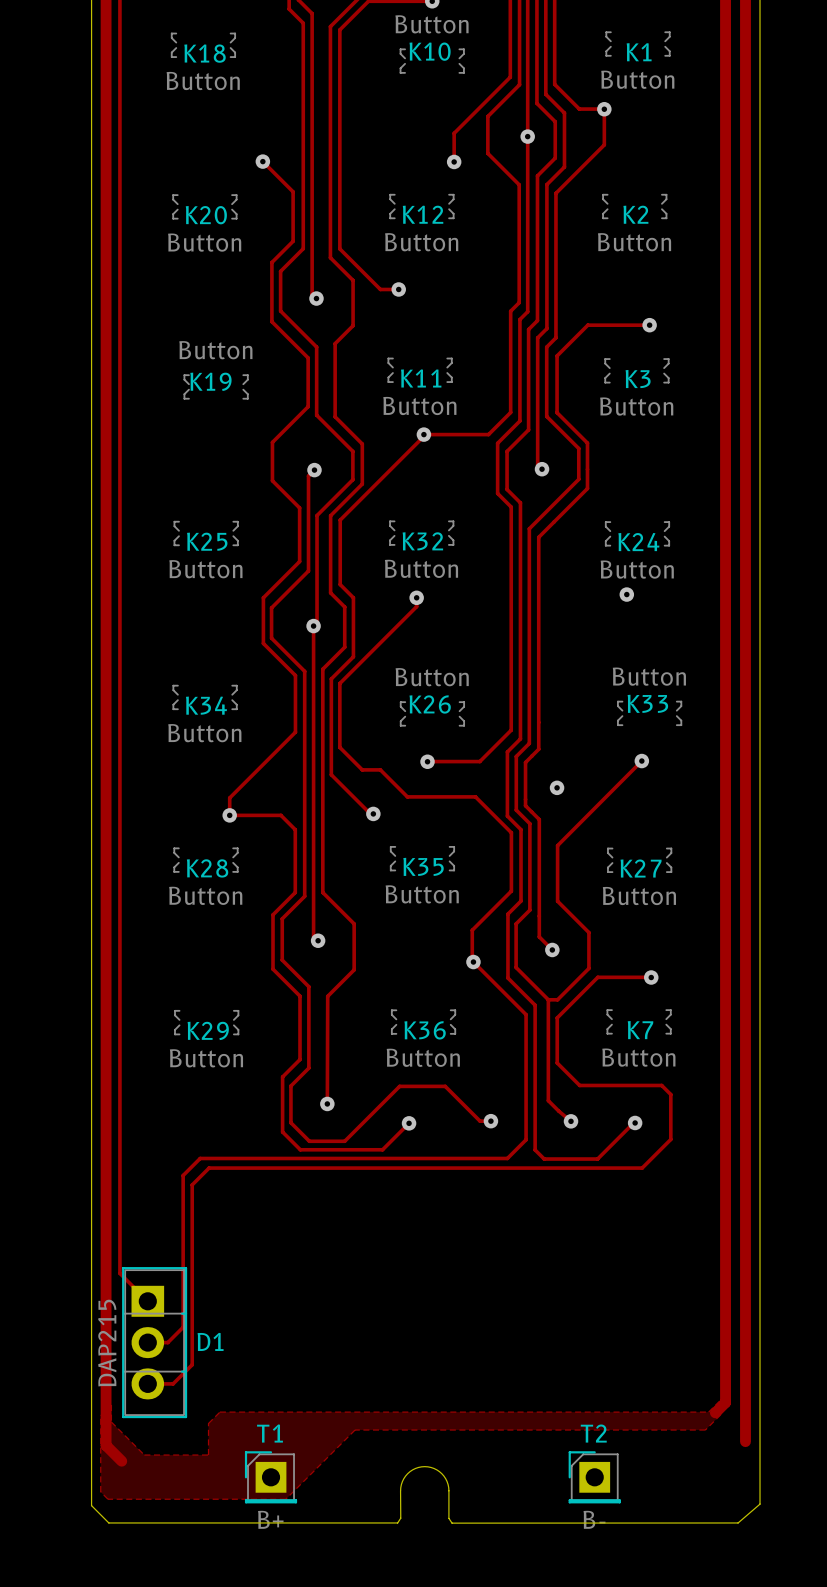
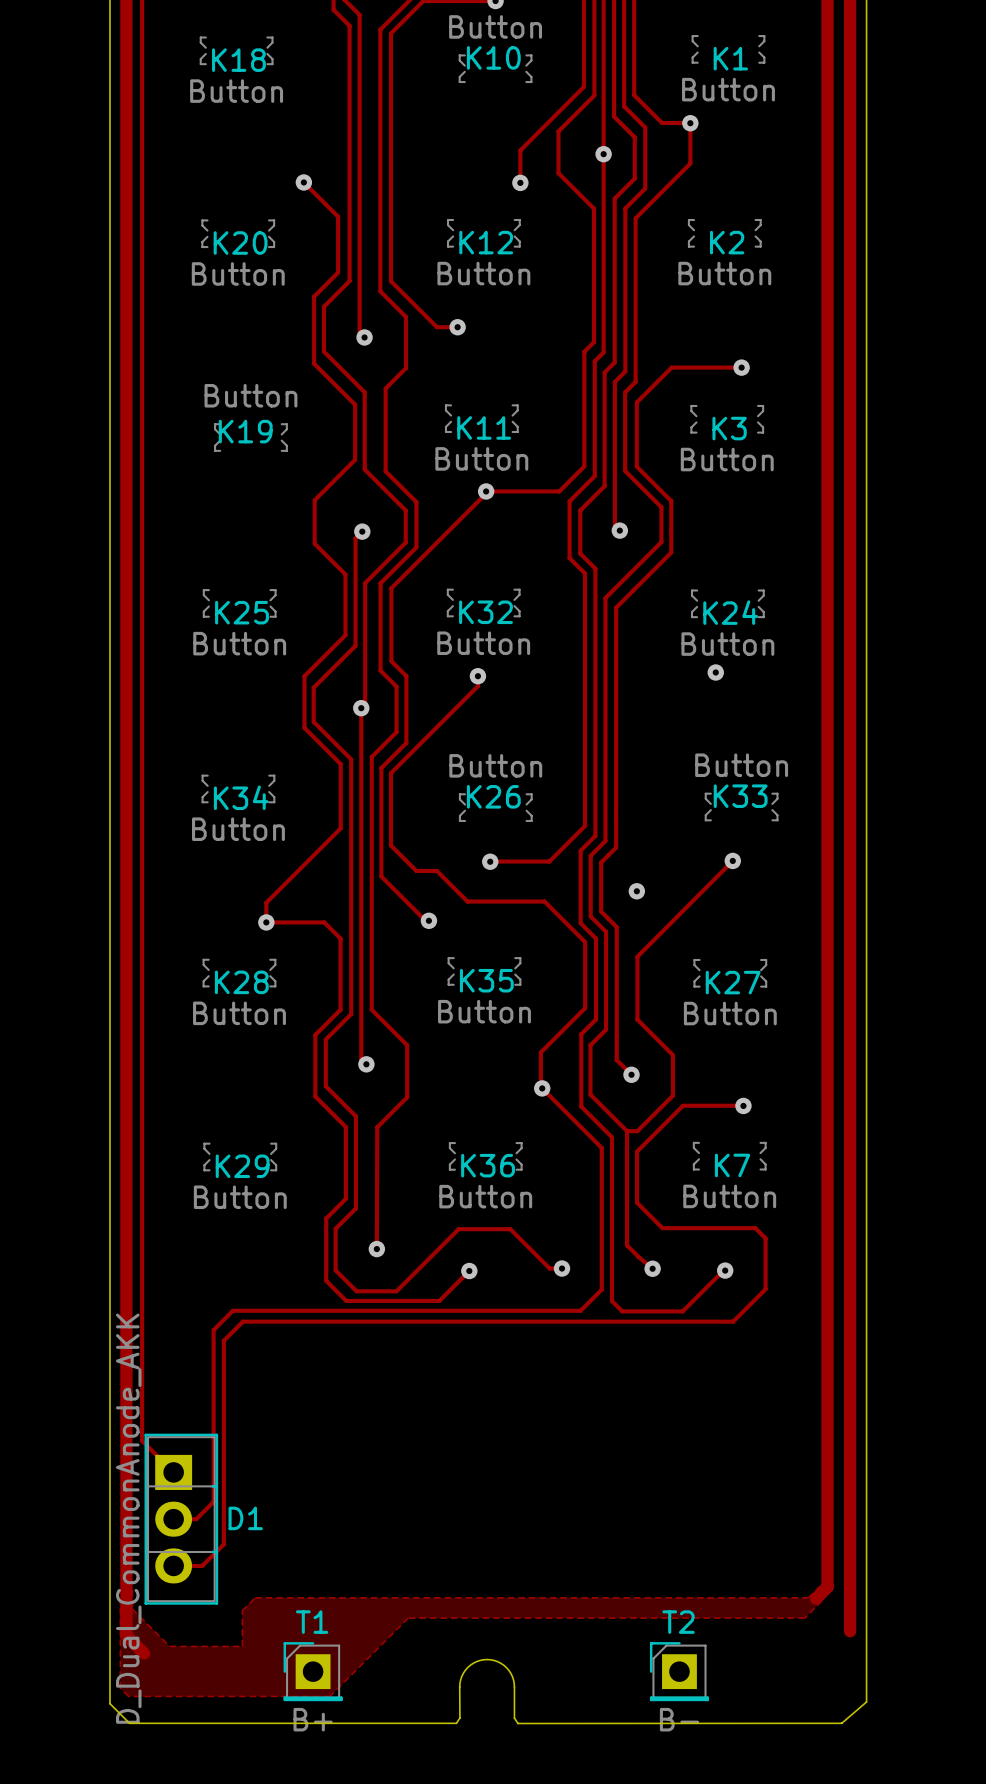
D1 value: DAP215 (107, 1343) -> D_Dual_CommonAnode_AKK (128, 1518)

